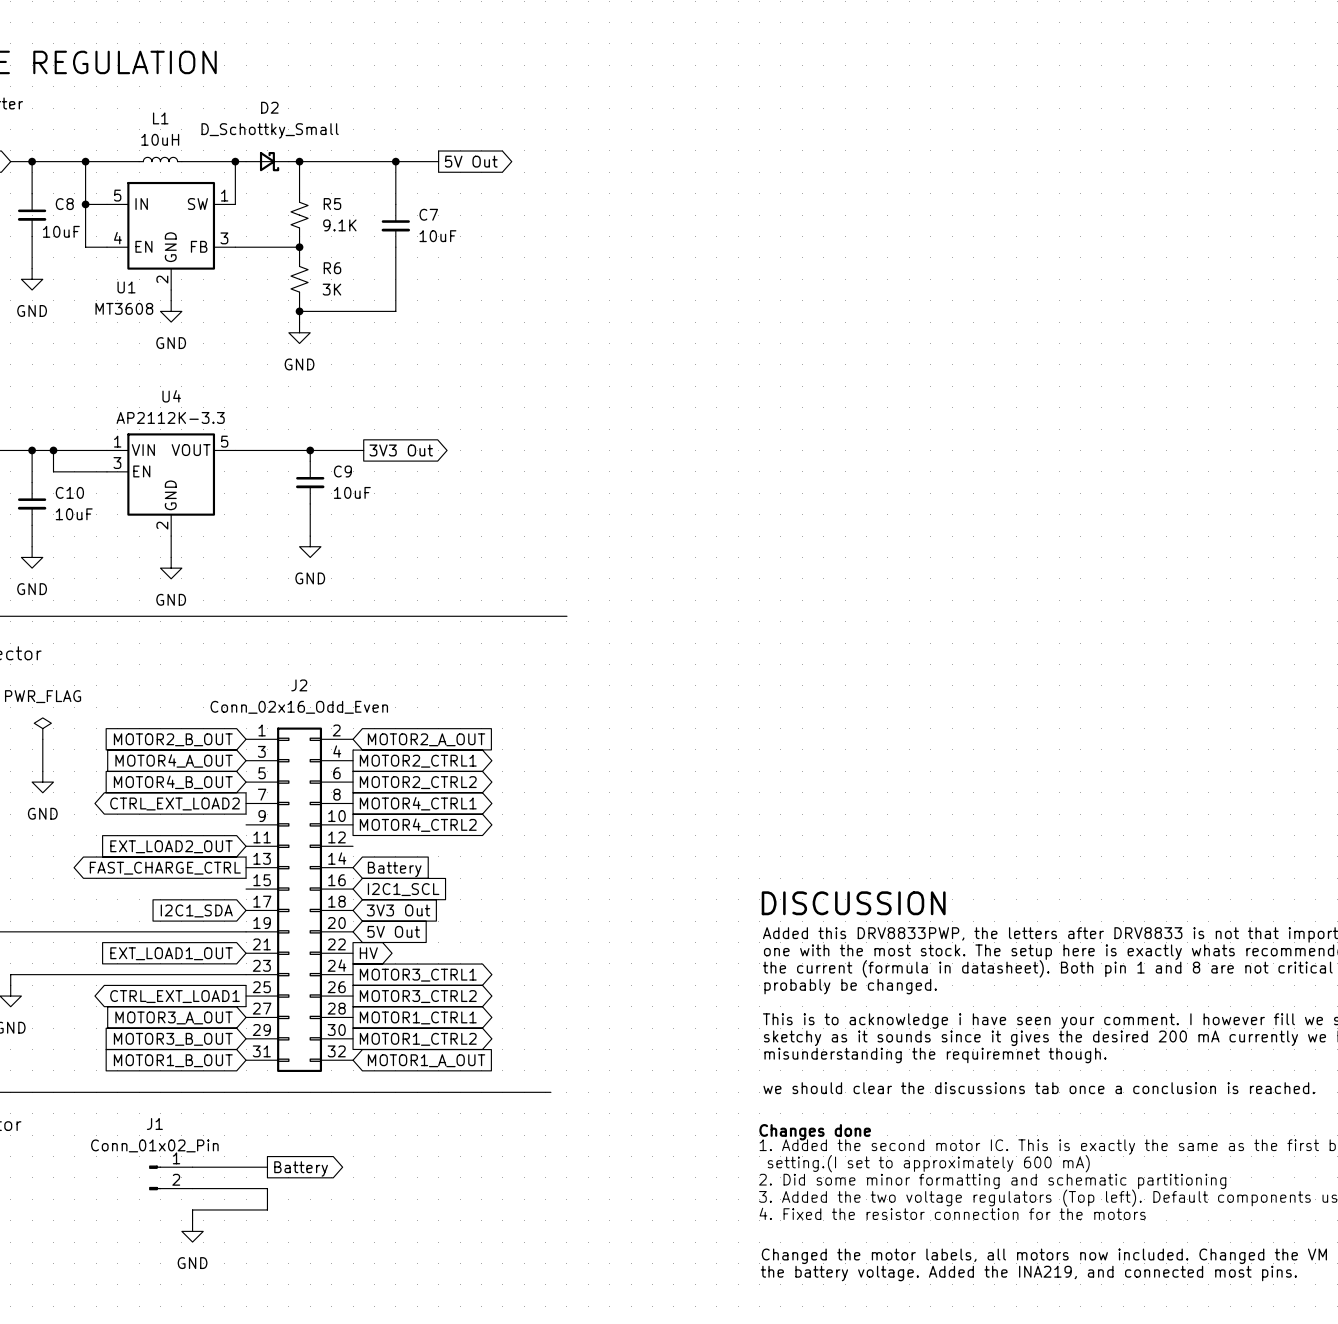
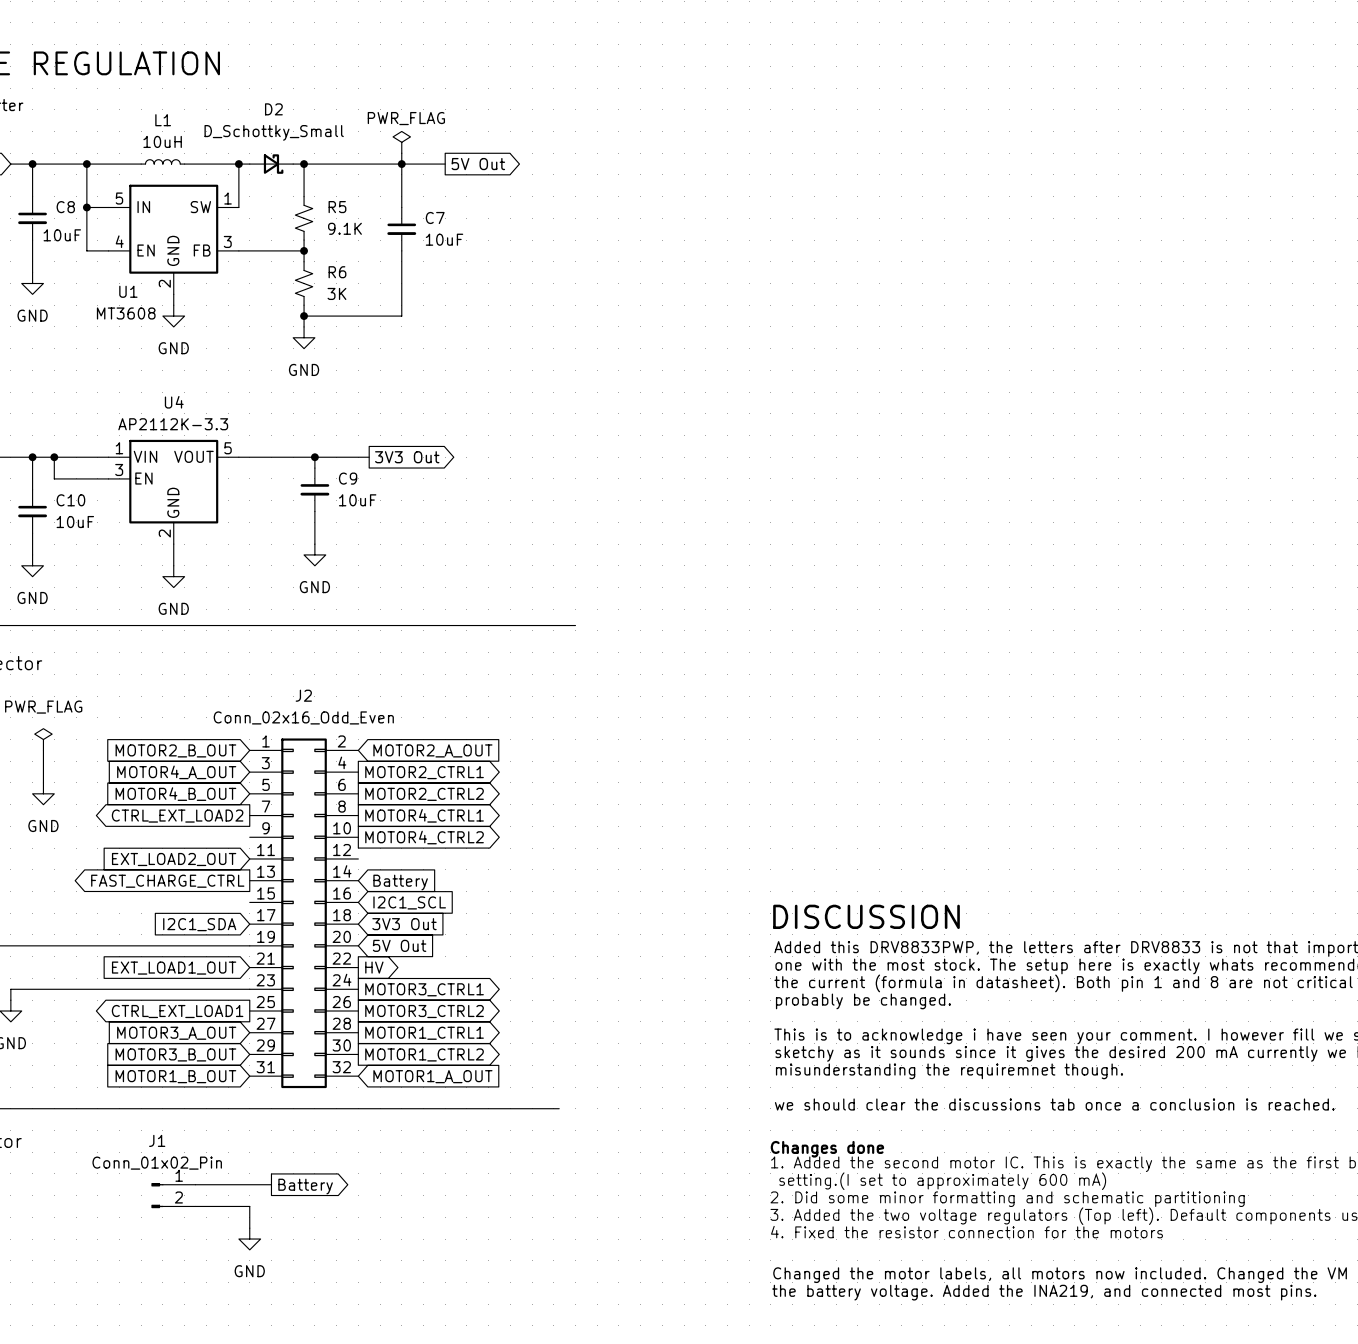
power symbol: none -> PWR_FLAG (401, 142)
wire: none -> (401, 153) (401, 164)
wire: (246, 1188) (267, 1188) (267, 1209) (192, 1209) (192, 1220) -> (249, 1206) (249, 1228)
power symbol position: GND (192, 1231) -> GND (249, 1239)

